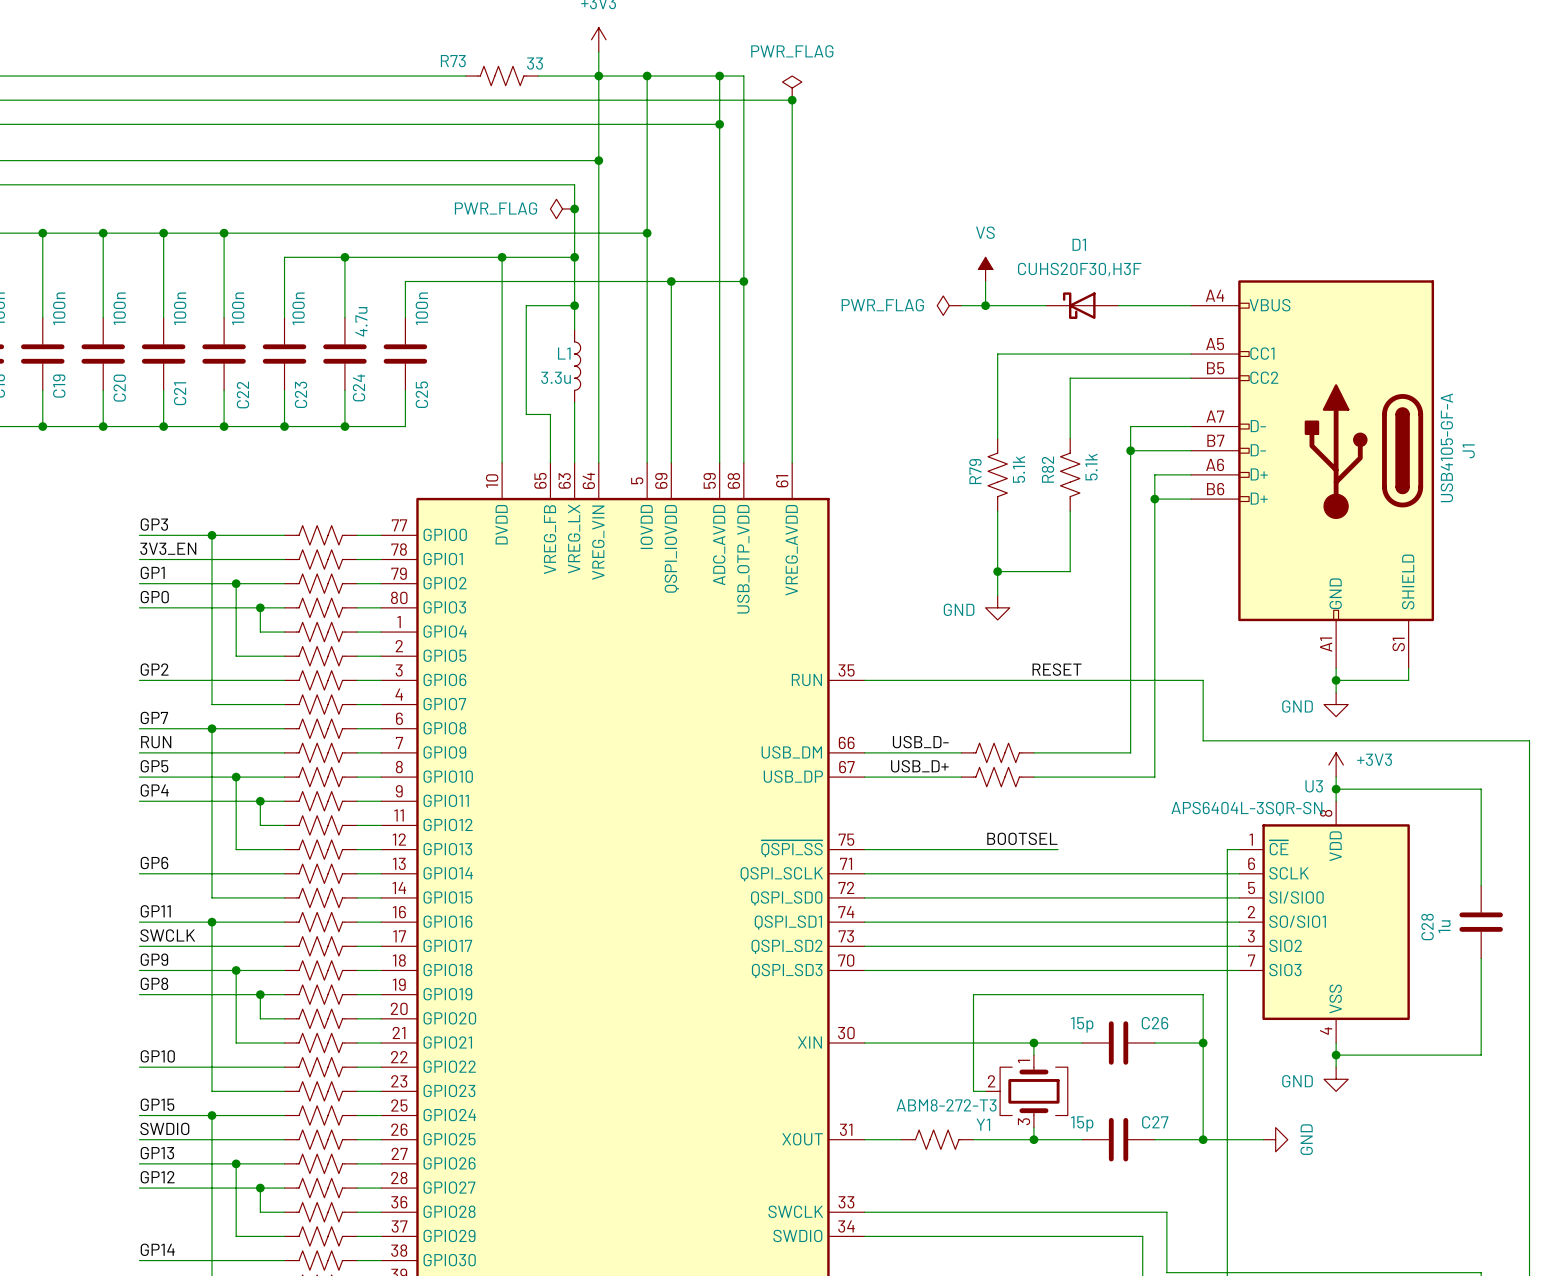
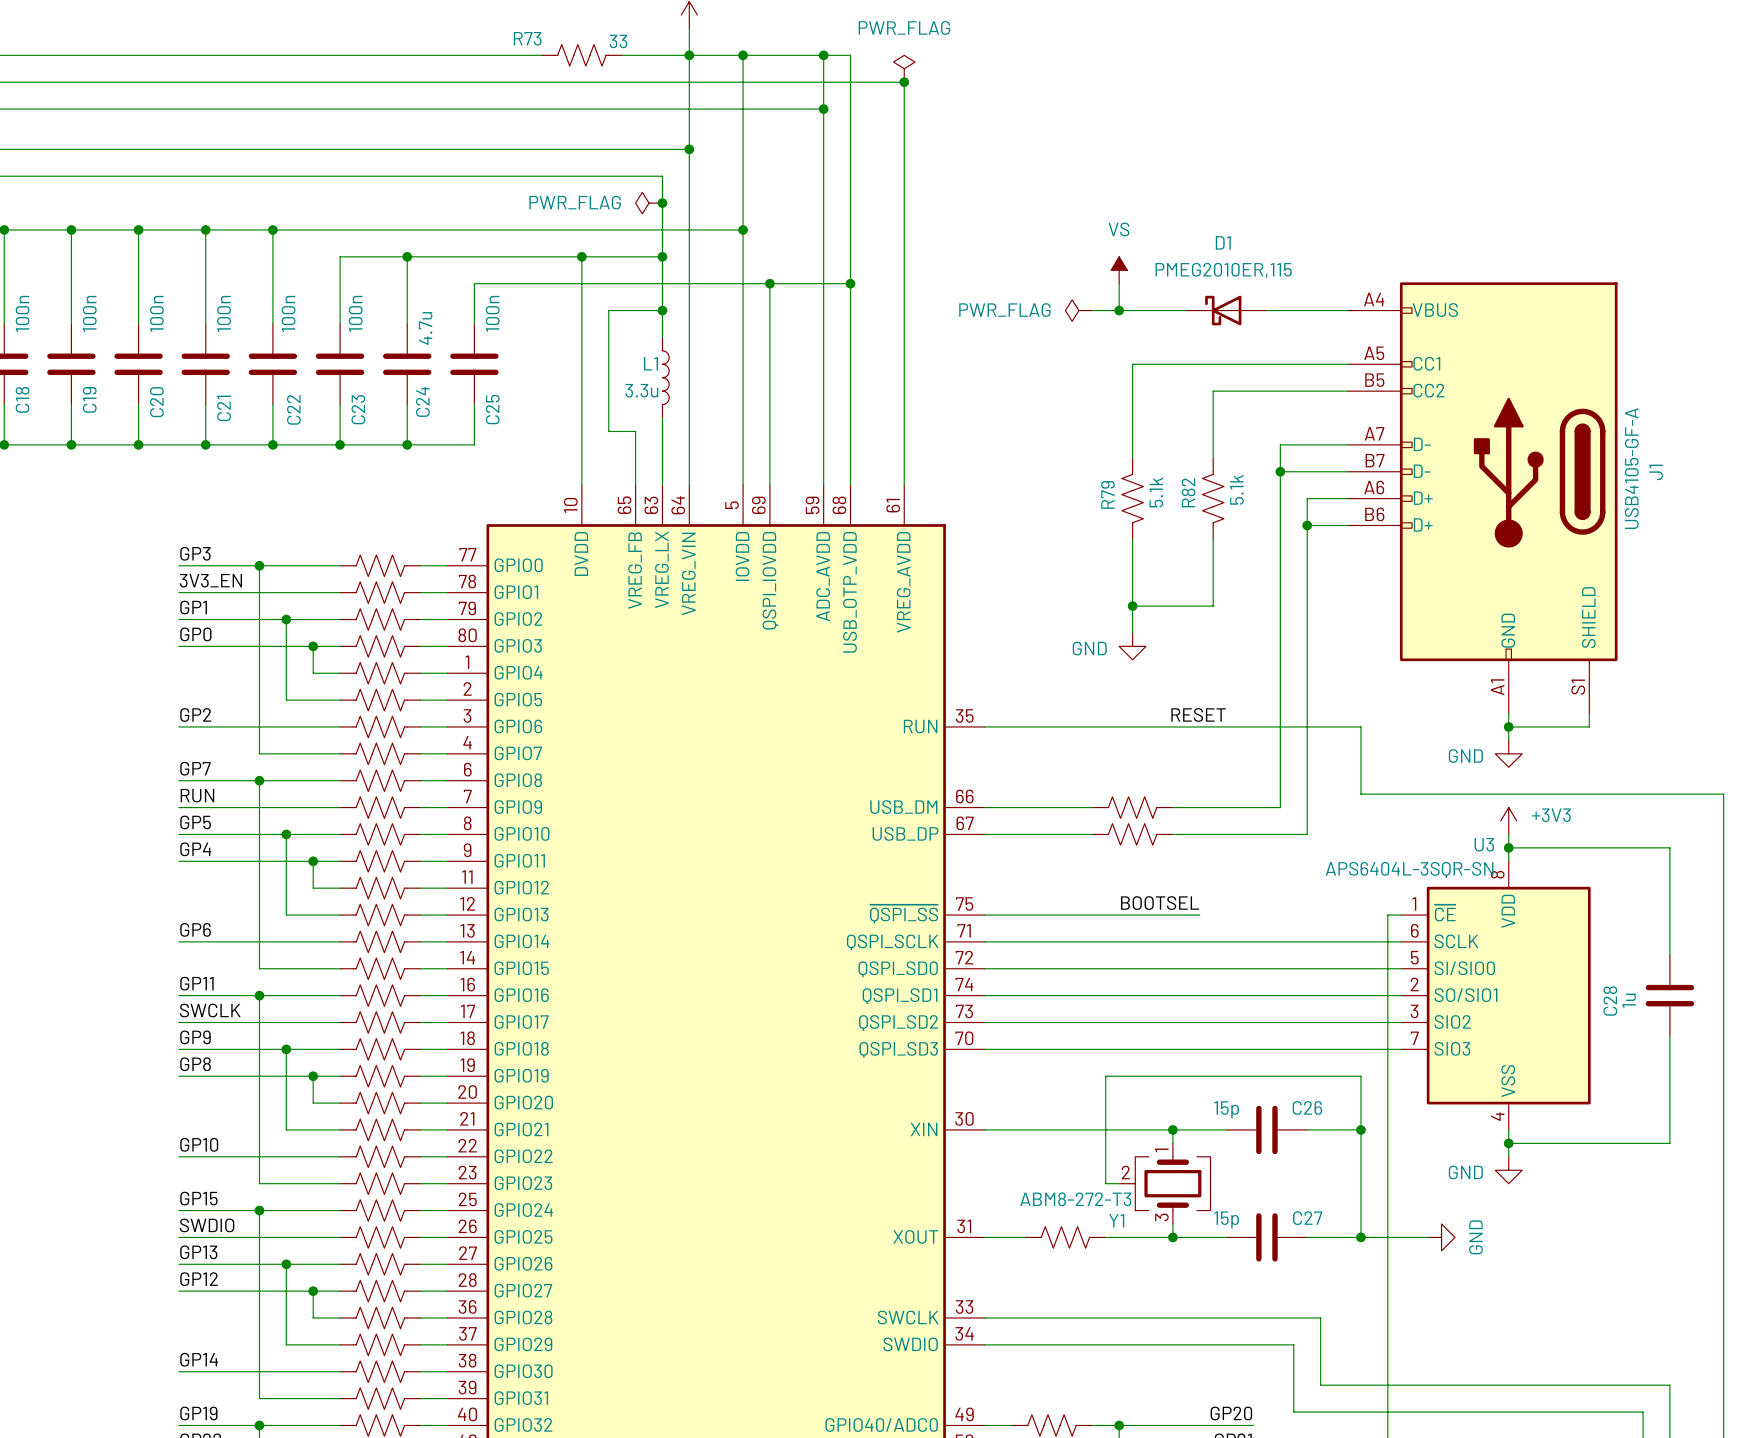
D1 value: CUHS20F30,H3F (1079, 269) -> PMEG2010ER,115 (1223, 270)
label: USB_D- (920, 742) -> none
label: USB_D+ (919, 766) -> none

